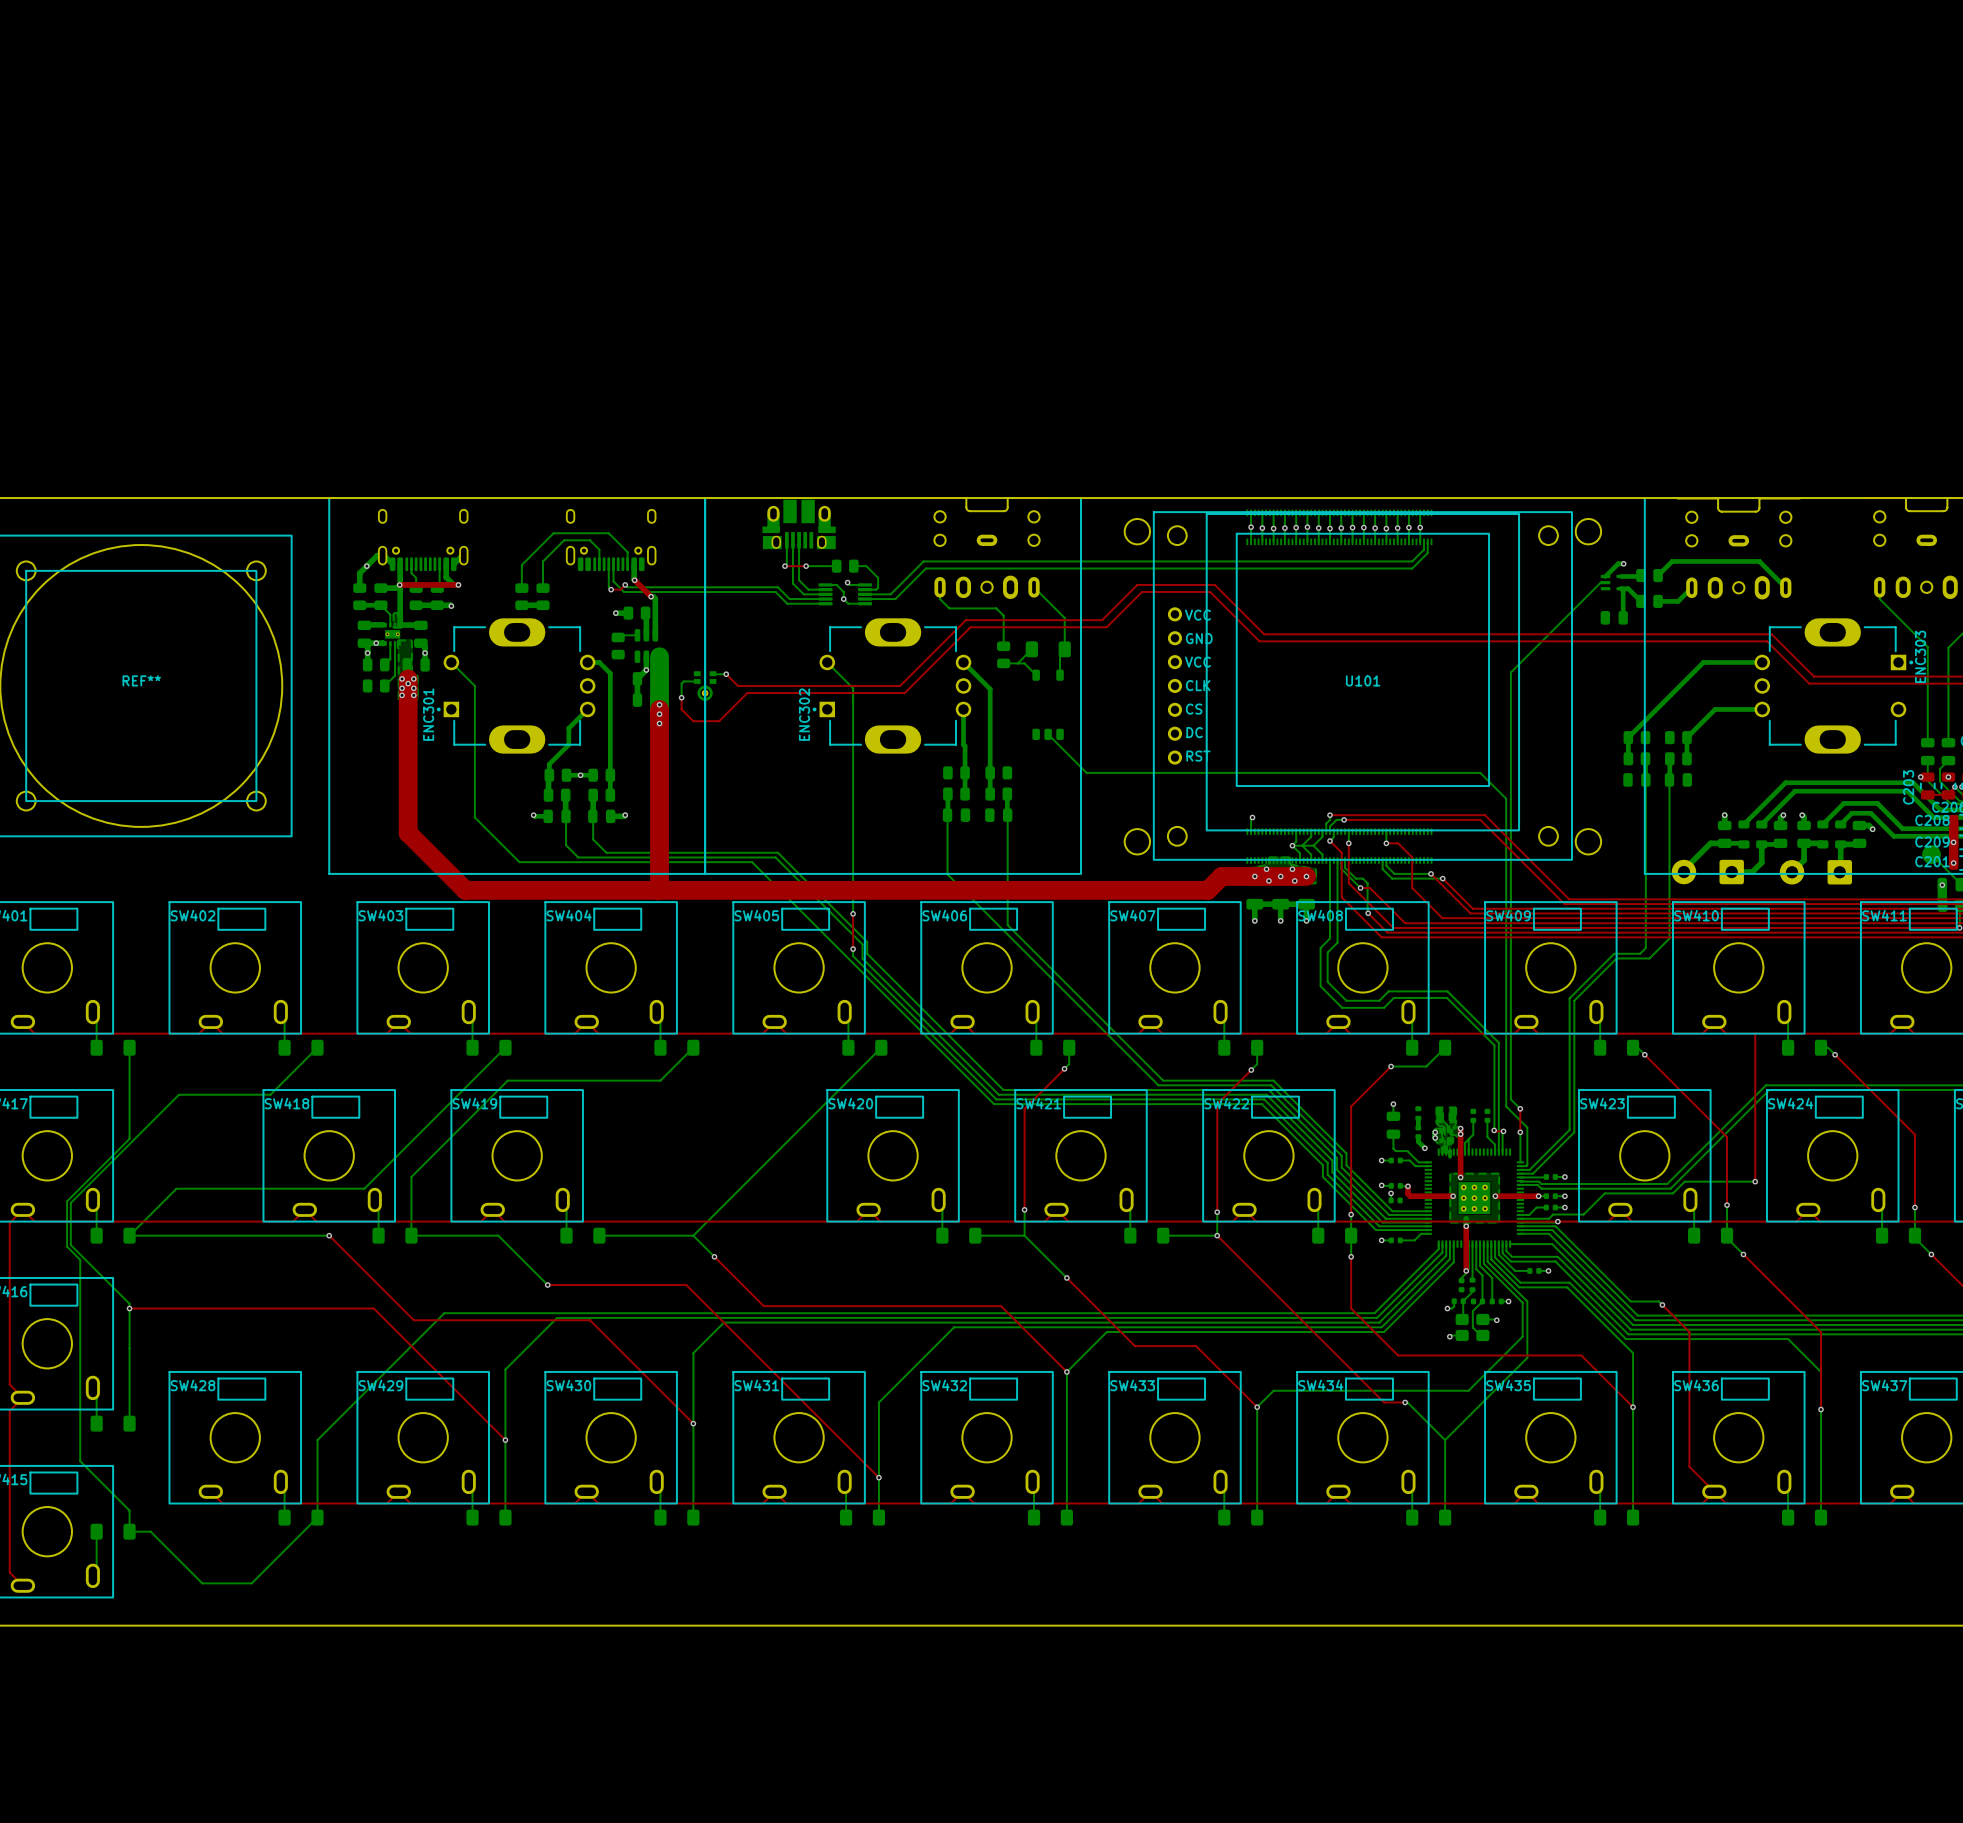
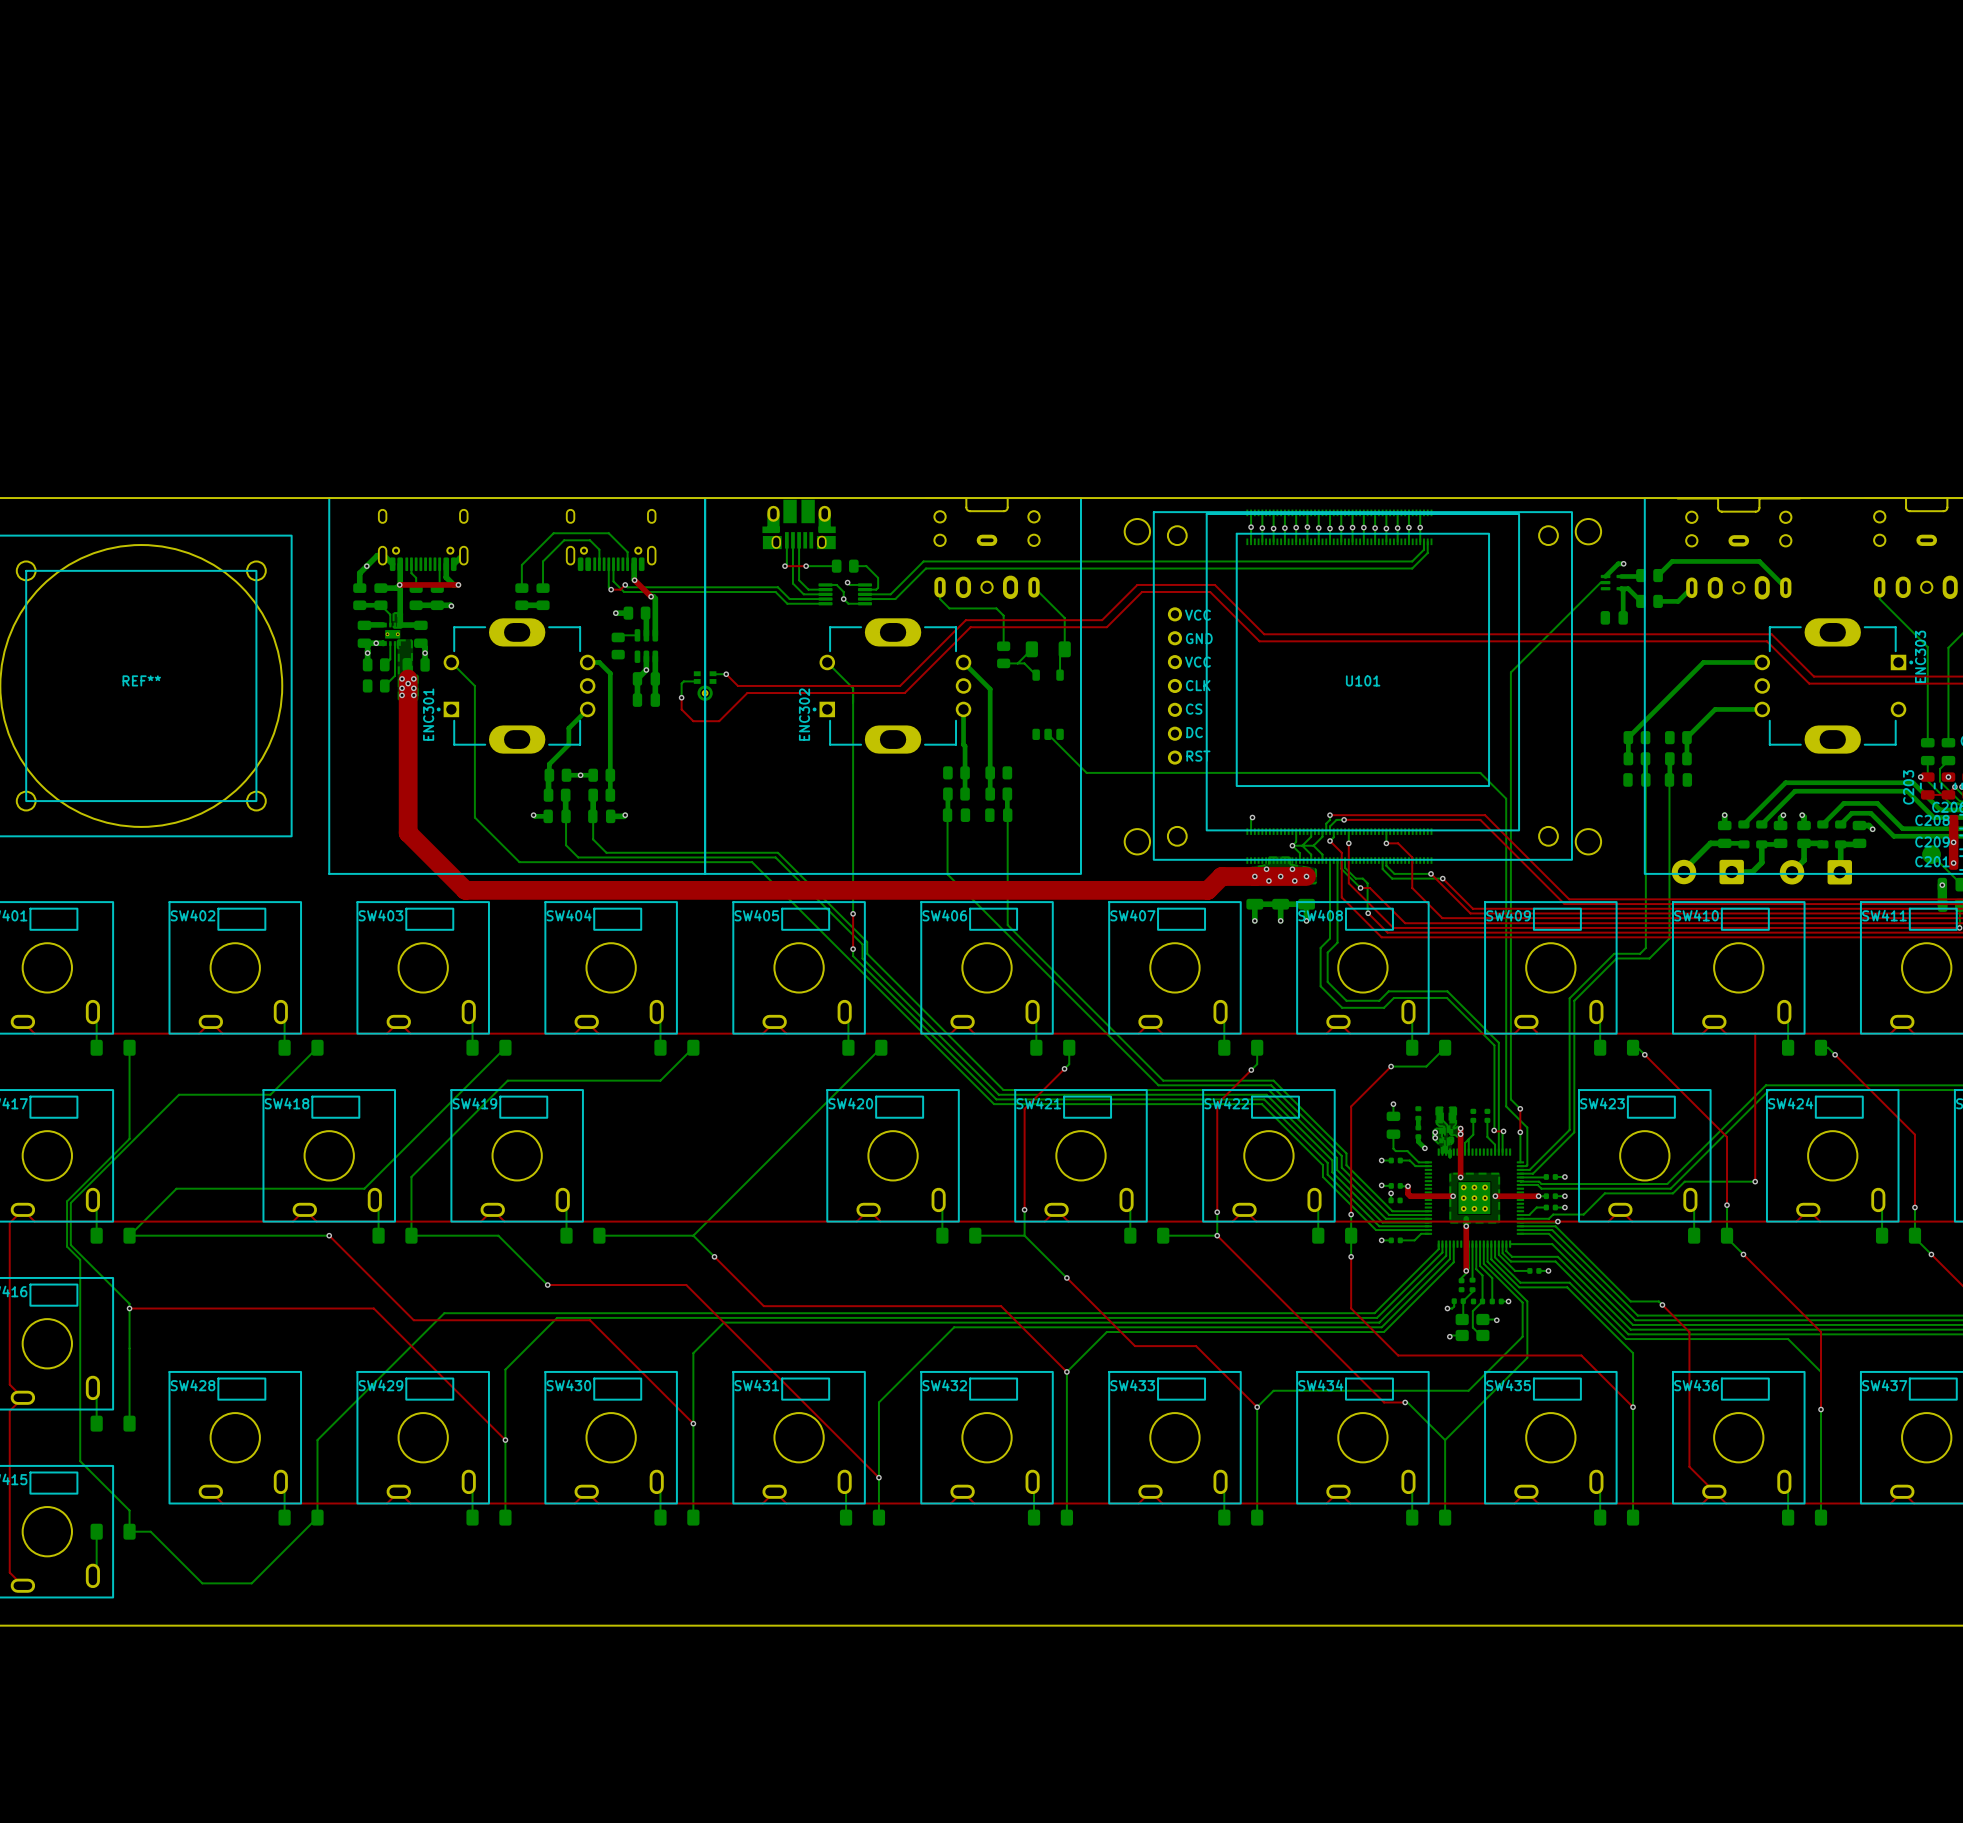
bottom track: (659, 656) (659, 722) -> none
via: (659, 704) -> none
top track: (659, 709) (659, 885) -> none
via: (659, 714) -> none
via: (659, 723) -> none

